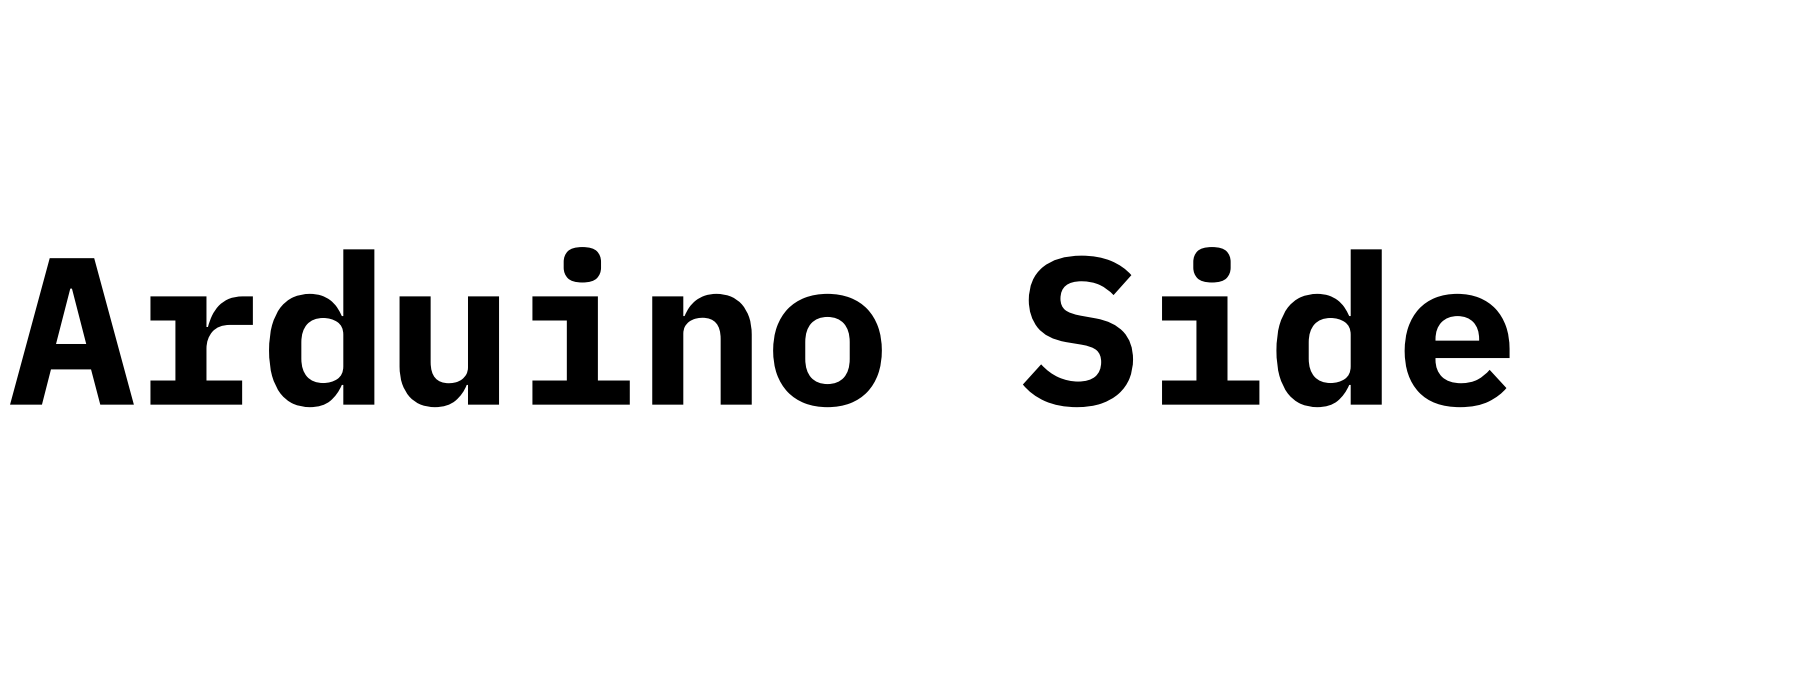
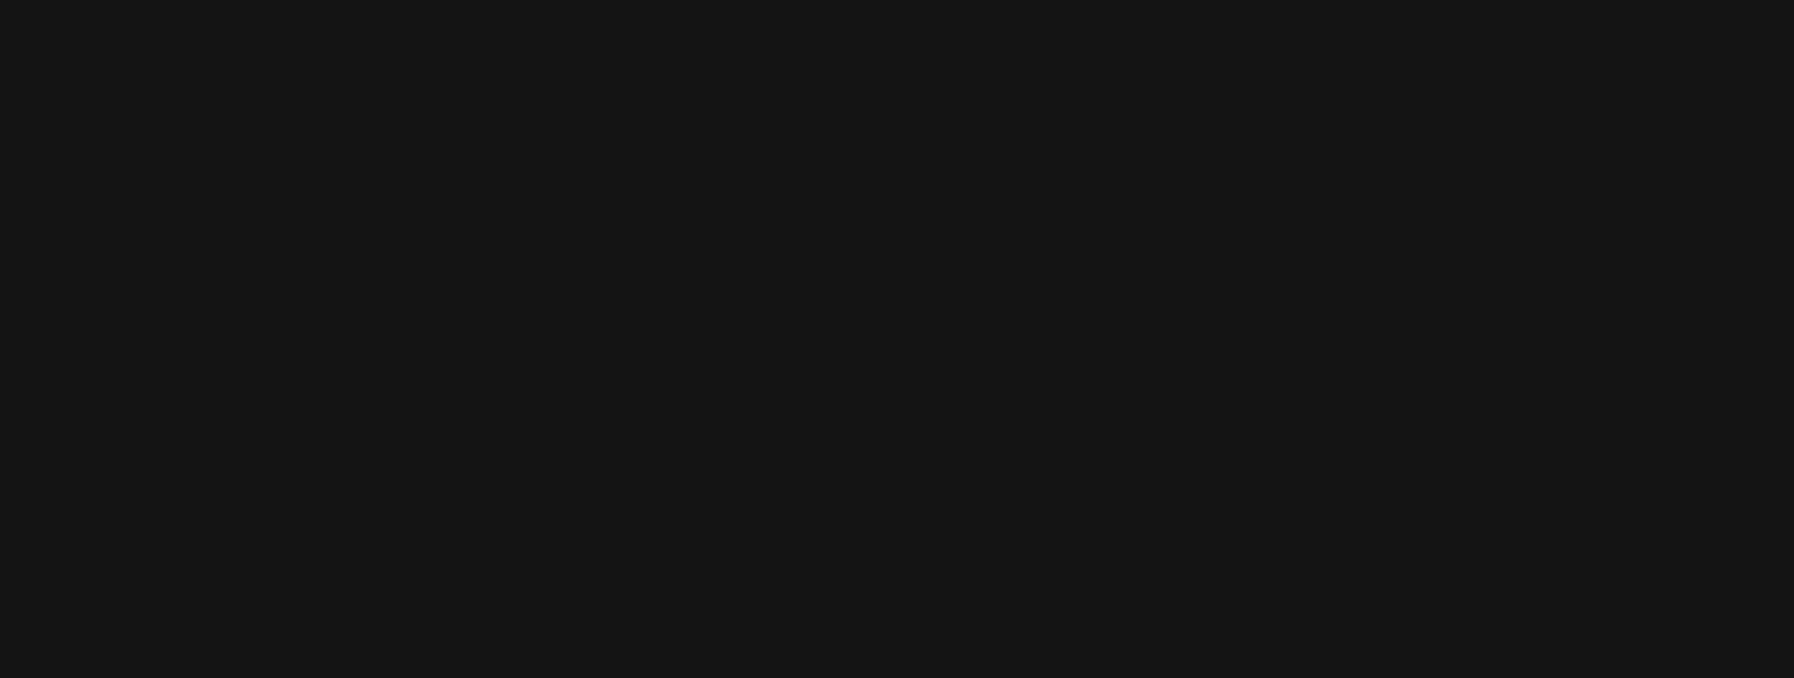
text: Arduino Side (759, 327) -> none

